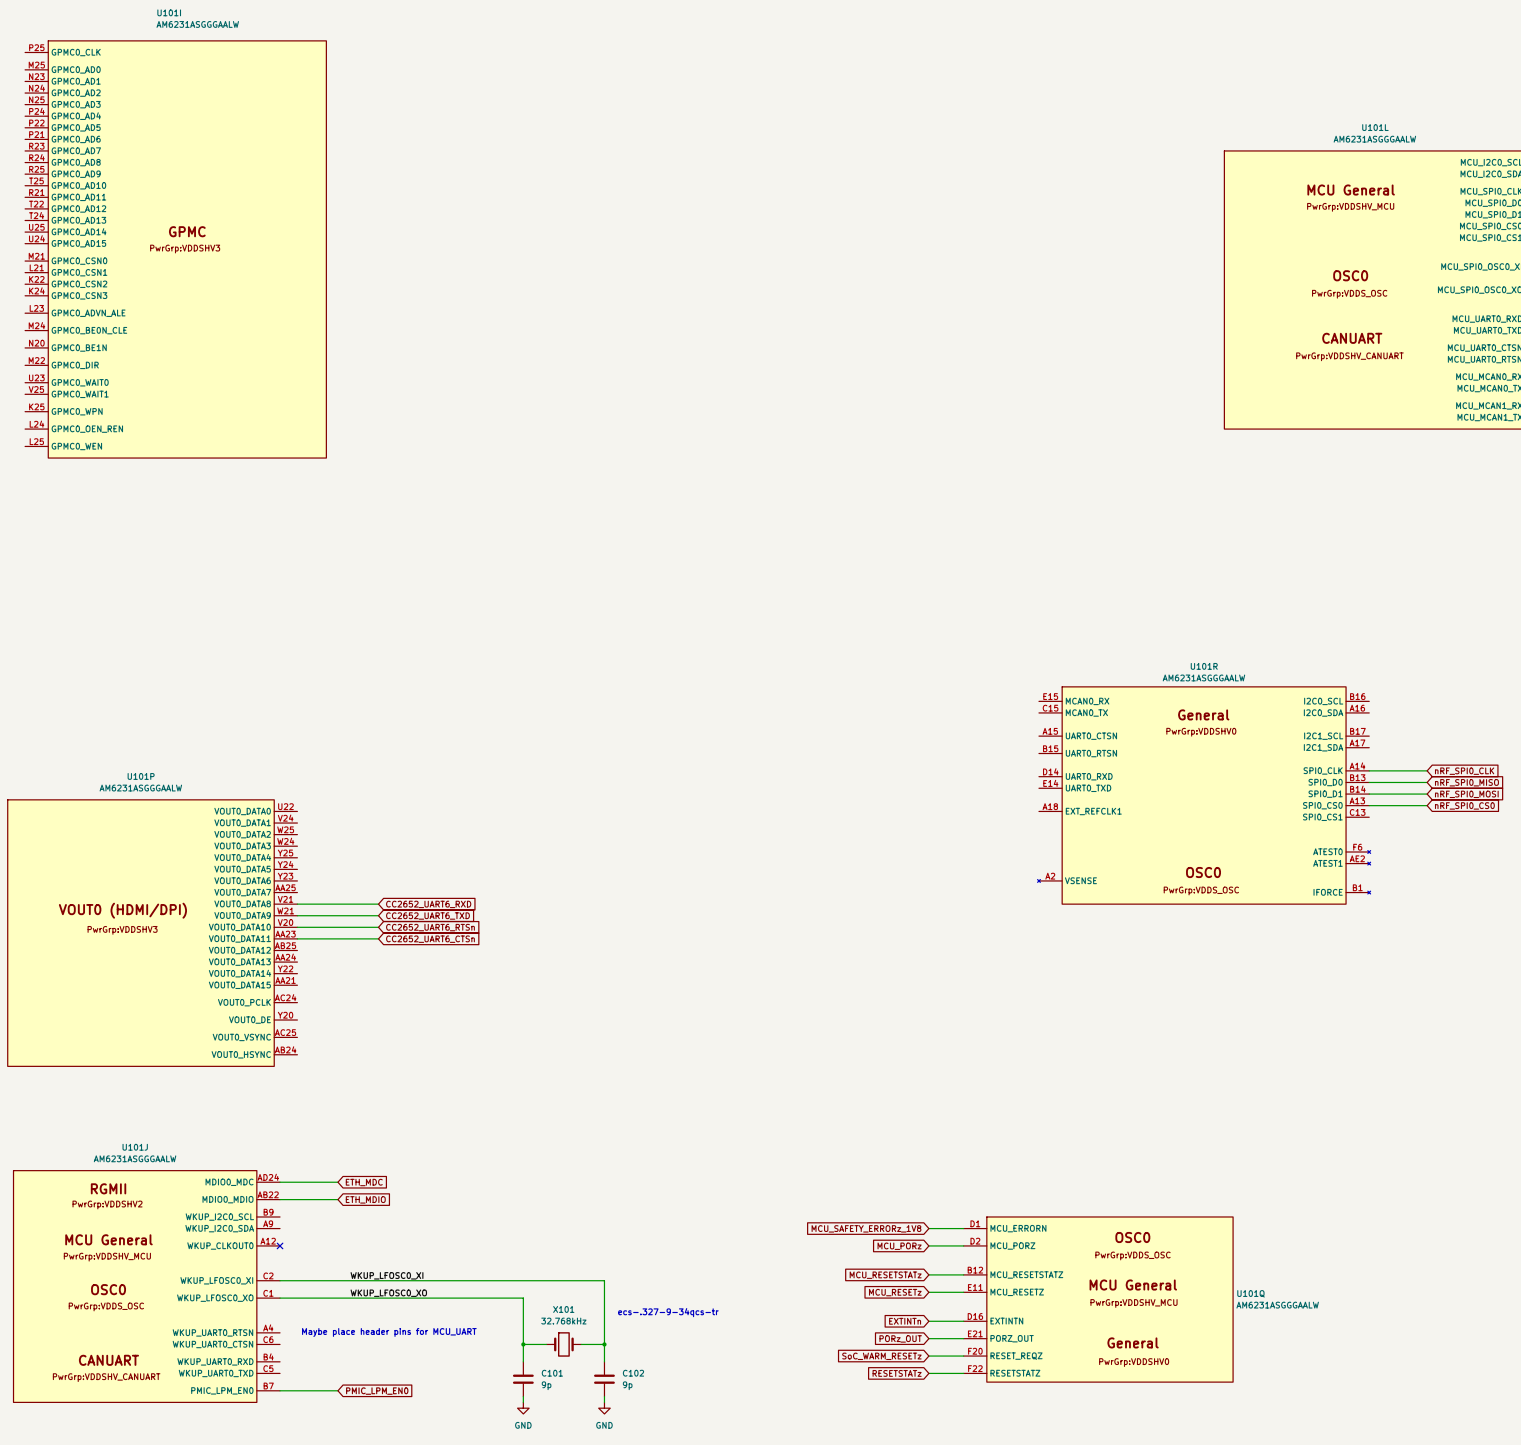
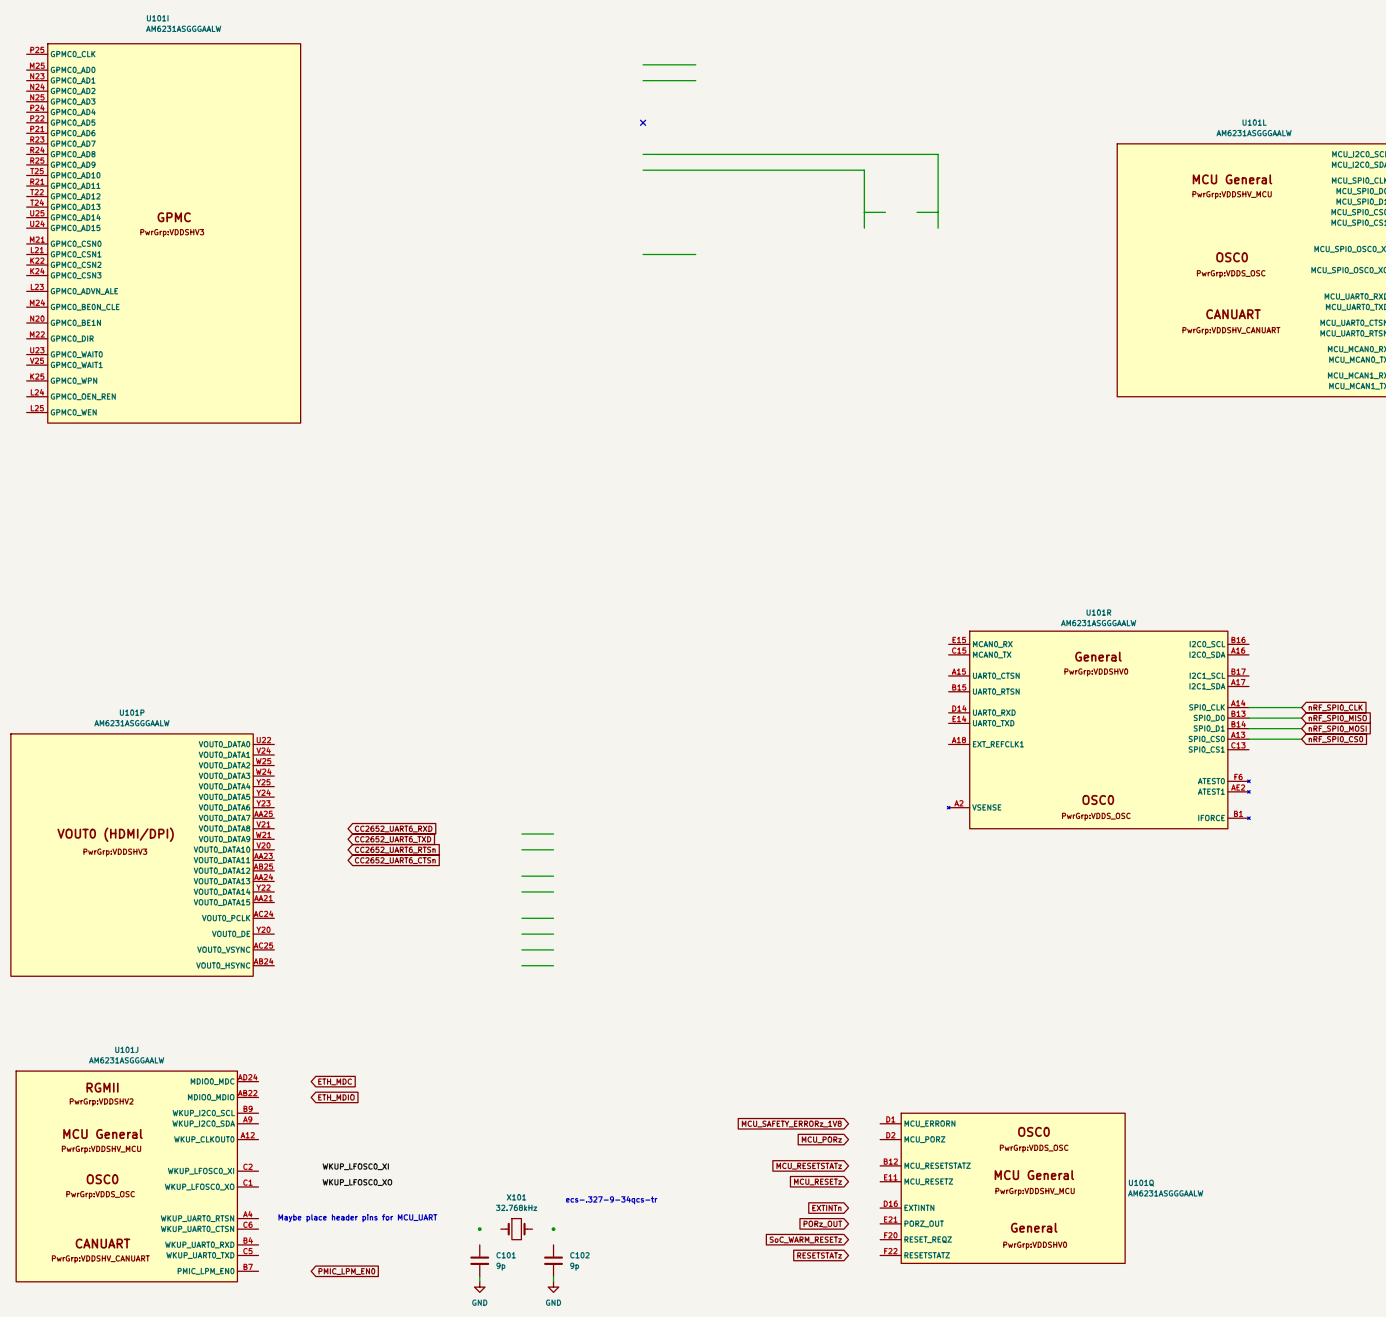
wire: none -> (643, 64) (695, 64)
wire: none -> (643, 80) (695, 80)
no-connect mark: none -> (643, 122)
wire: none -> (643, 154) (938, 154) (938, 228)
wire: none -> (643, 170) (864, 170) (864, 228)
wire: none -> (864, 212) (885, 212)
wire: none -> (917, 212) (938, 212)
wire: none -> (643, 254) (695, 254)
wire: (297, 904) (378, 904) -> none
wire: none -> (521, 834) (553, 834)
wire: (297, 915) (378, 915) -> none
wire: (297, 927) (378, 927) -> none
wire: none -> (521, 849) (553, 849)
wire: (297, 938) (378, 938) -> none
wire: none -> (521, 876) (553, 876)
wire: none -> (521, 891) (553, 891)
wire: none -> (521, 918) (553, 918)
wire: none -> (521, 934) (553, 934)
wire: none -> (521, 949) (553, 949)
wire: none -> (521, 965) (553, 965)
wire: (280, 1182) (337, 1182) -> none
wire: (280, 1199) (337, 1199) -> none
wire: (928, 1228) (963, 1228) -> none
no-connect mark: (280, 1245) -> none
wire: (928, 1245) (963, 1245) -> none
wire: (928, 1274) (963, 1274) -> none
wire: (280, 1280) (604, 1280) (604, 1361) -> none
wire: (928, 1292) (963, 1292) -> none
wire: (280, 1298) (523, 1298) (523, 1361) -> none
wire: (928, 1321) (963, 1321) -> none
wire: (928, 1338) (963, 1338) -> none
wire: (523, 1344) (546, 1344) -> none
wire: (581, 1344) (604, 1344) -> none
wire: (928, 1356) (963, 1356) -> none
wire: (928, 1373) (963, 1373) -> none
wire: (280, 1390) (337, 1390) -> none

